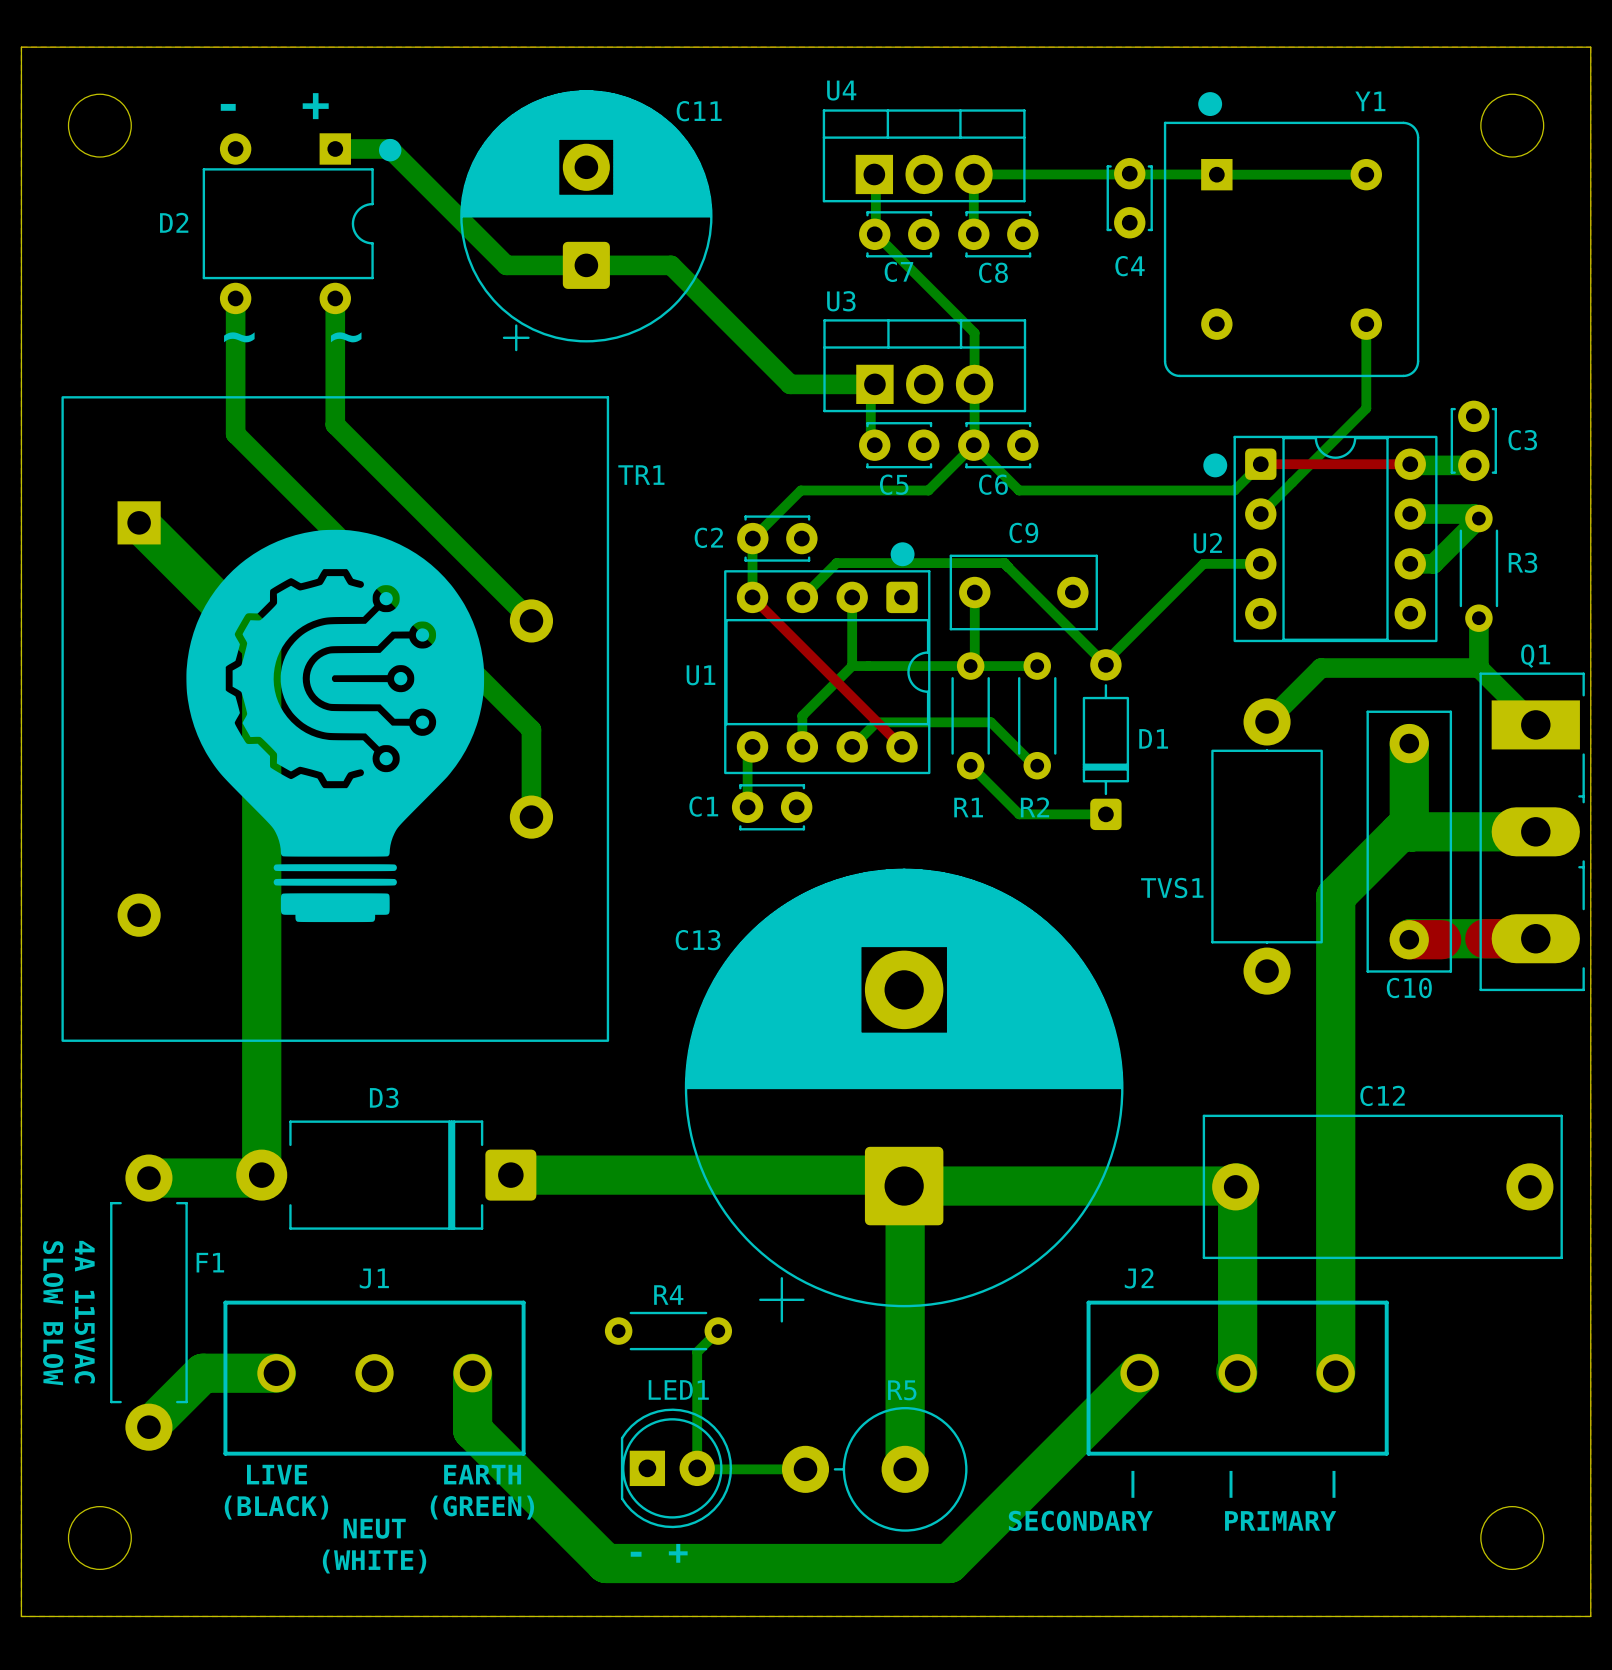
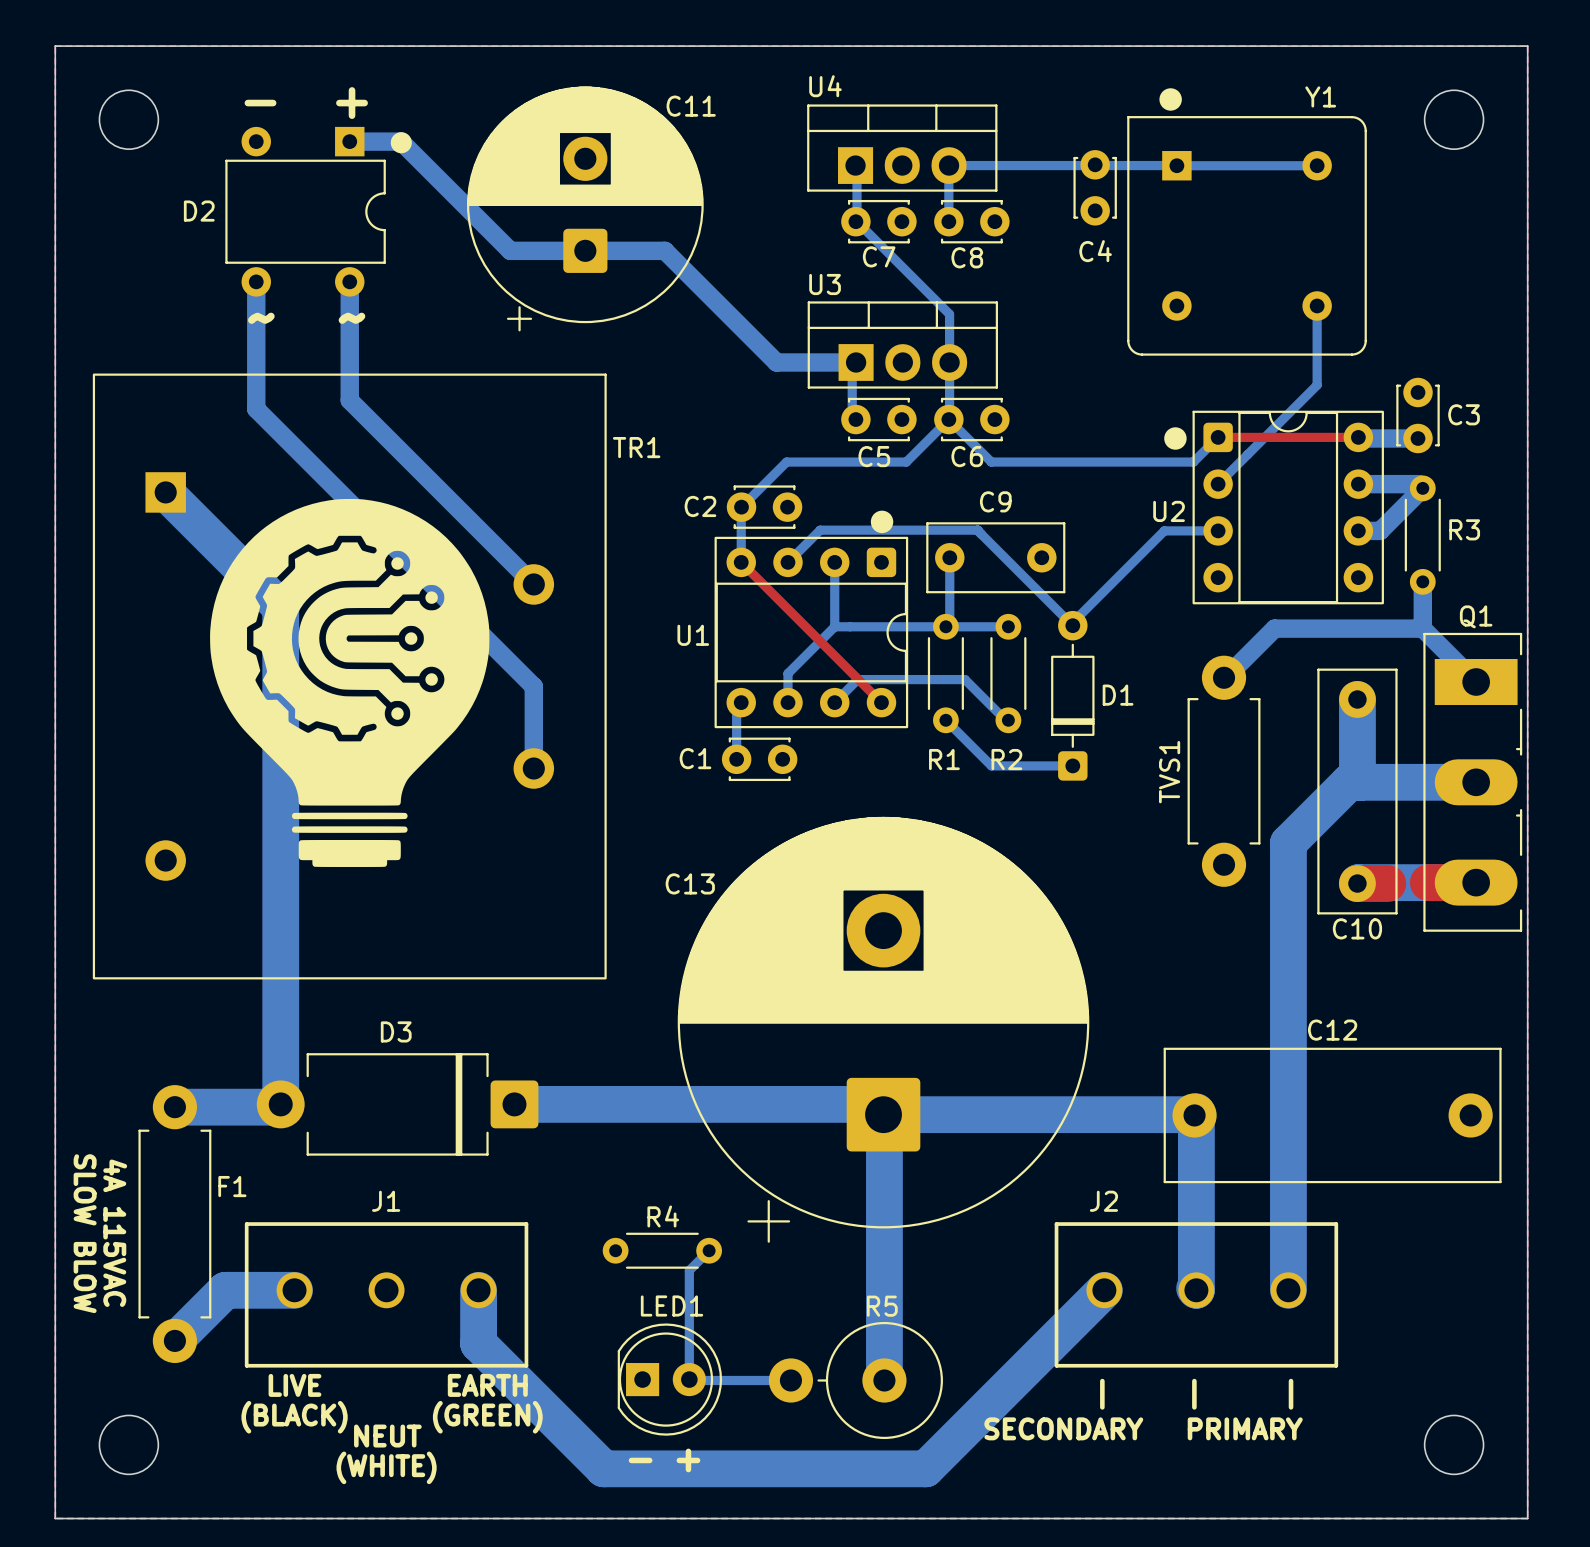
TVS1 footprint: [1211, 698, 1323, 995] -> [1187, 655, 1261, 887]
TVS1 name position: TVS1 (1172, 887) -> TVS1 (1169, 772)

